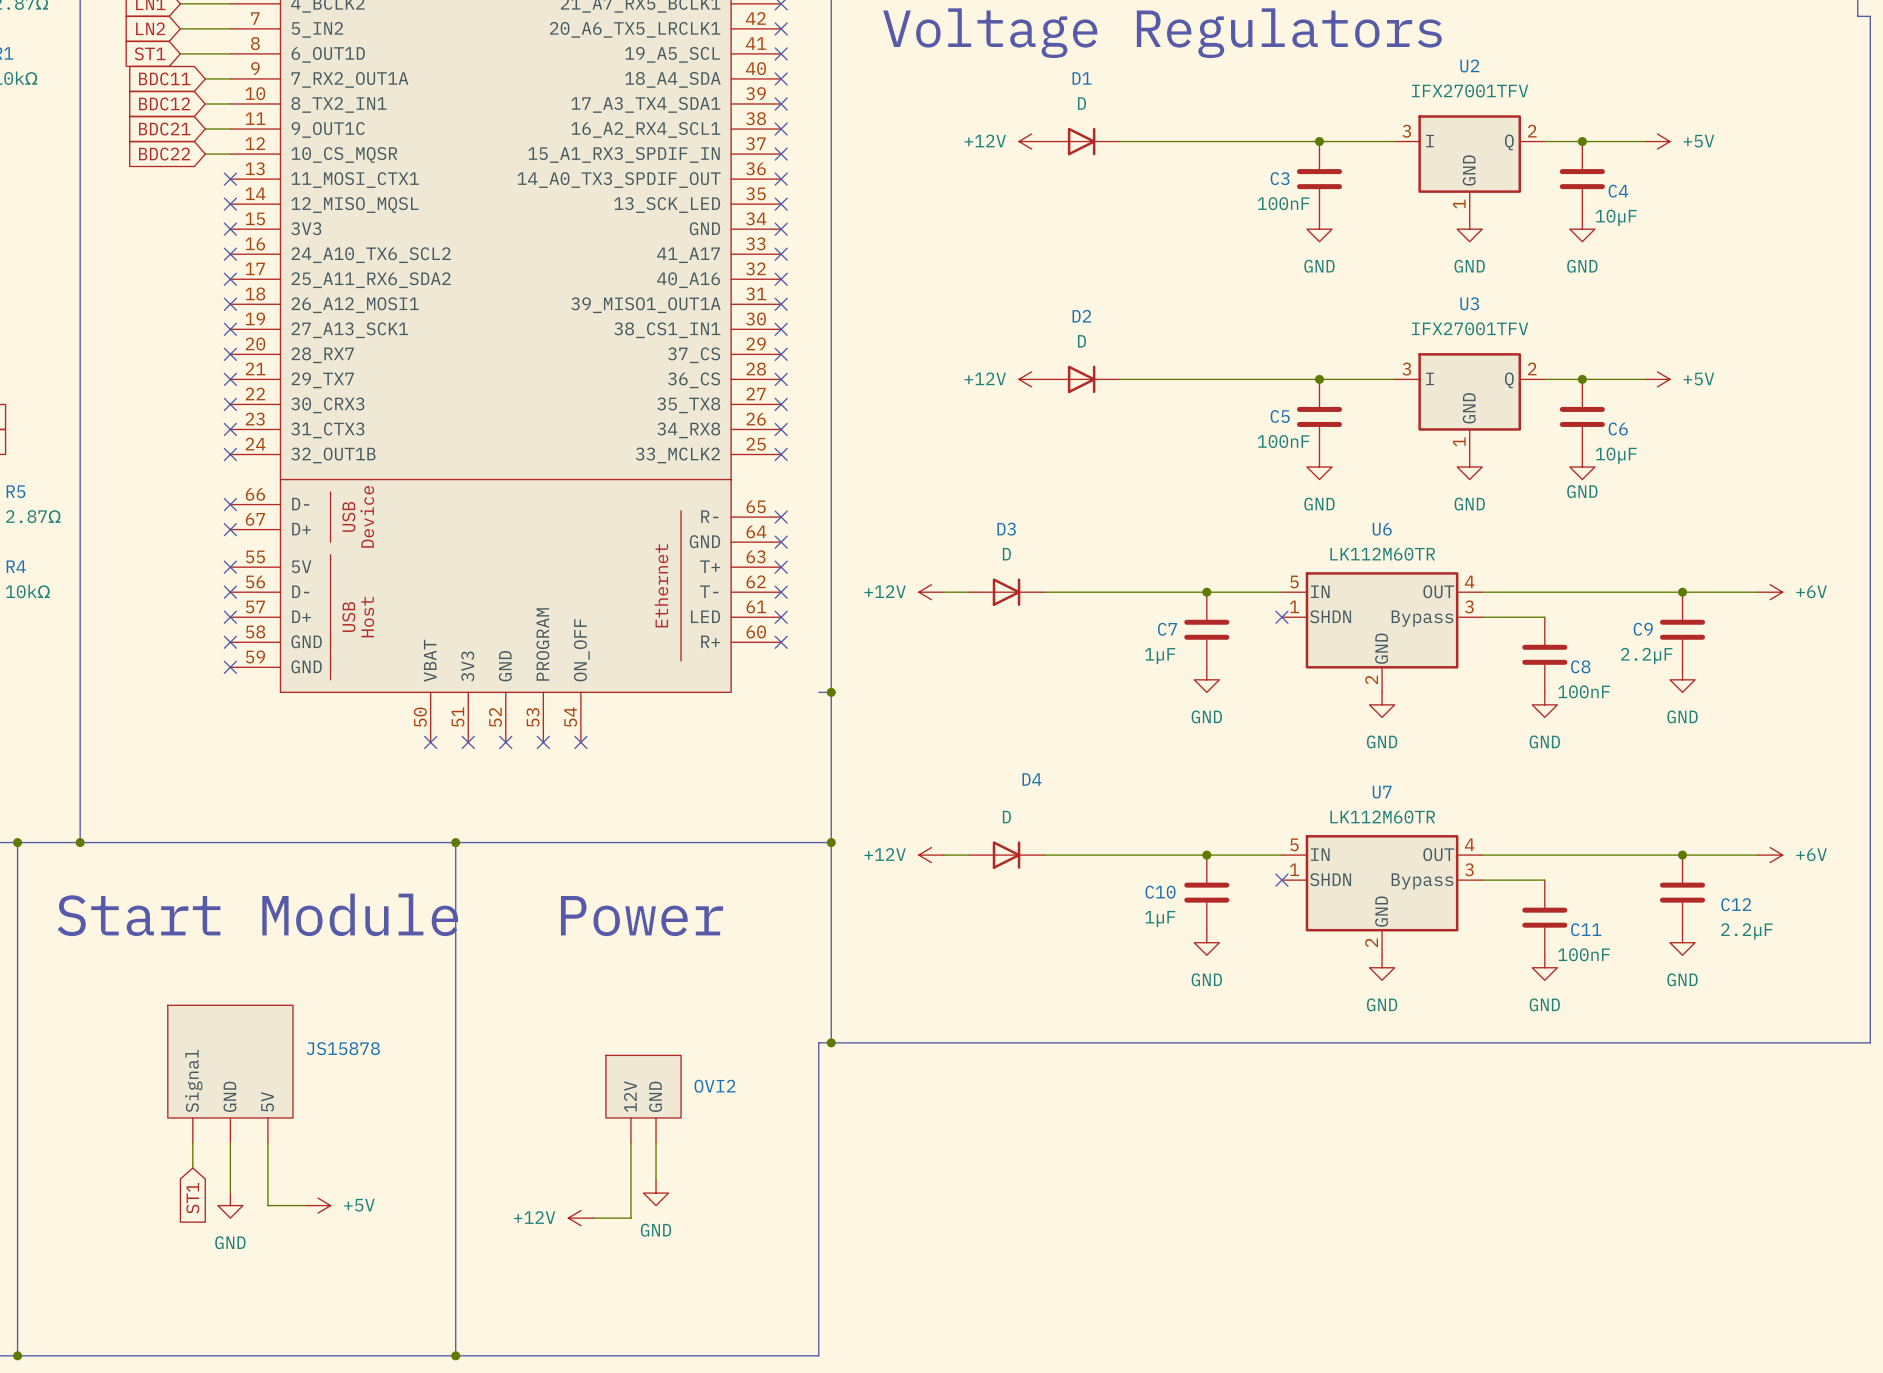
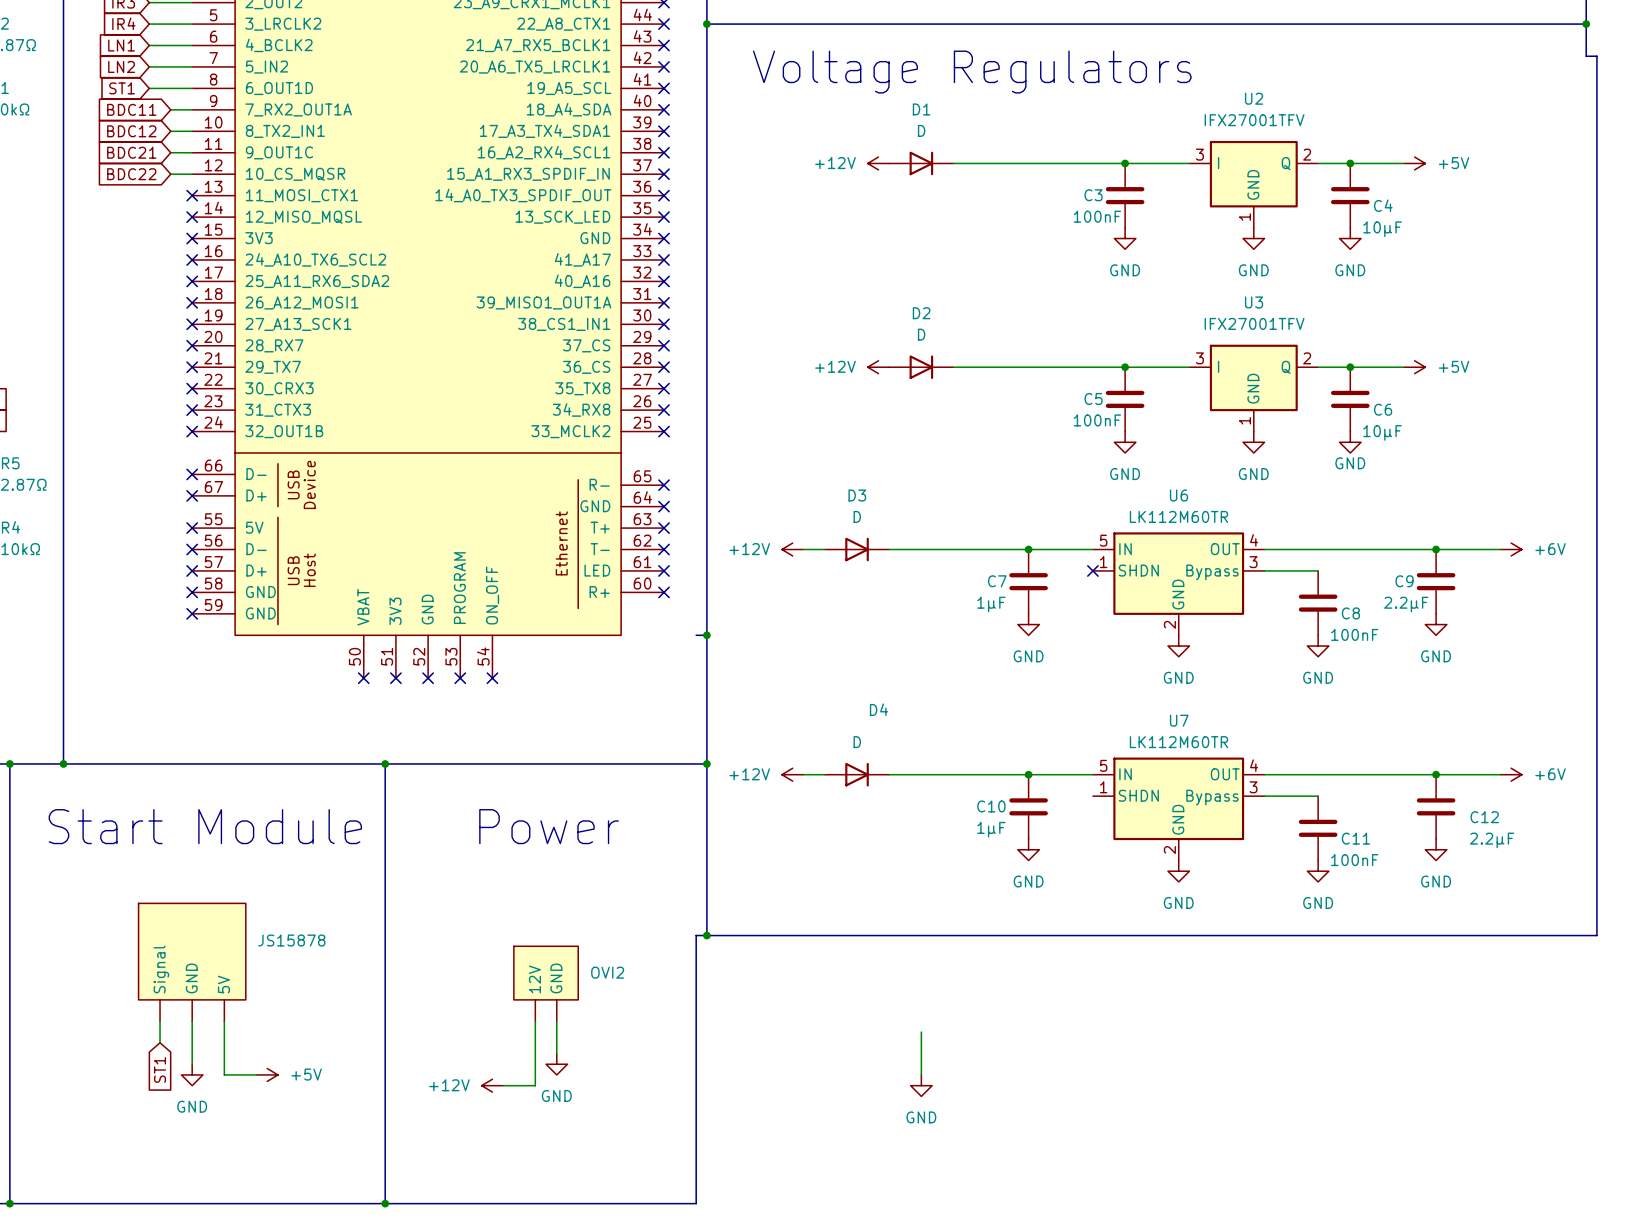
no-connect mark: (1281, 880) -> none
wire: none -> (921, 1032) (921, 1074)
power symbol: none -> GND (921, 1085)

